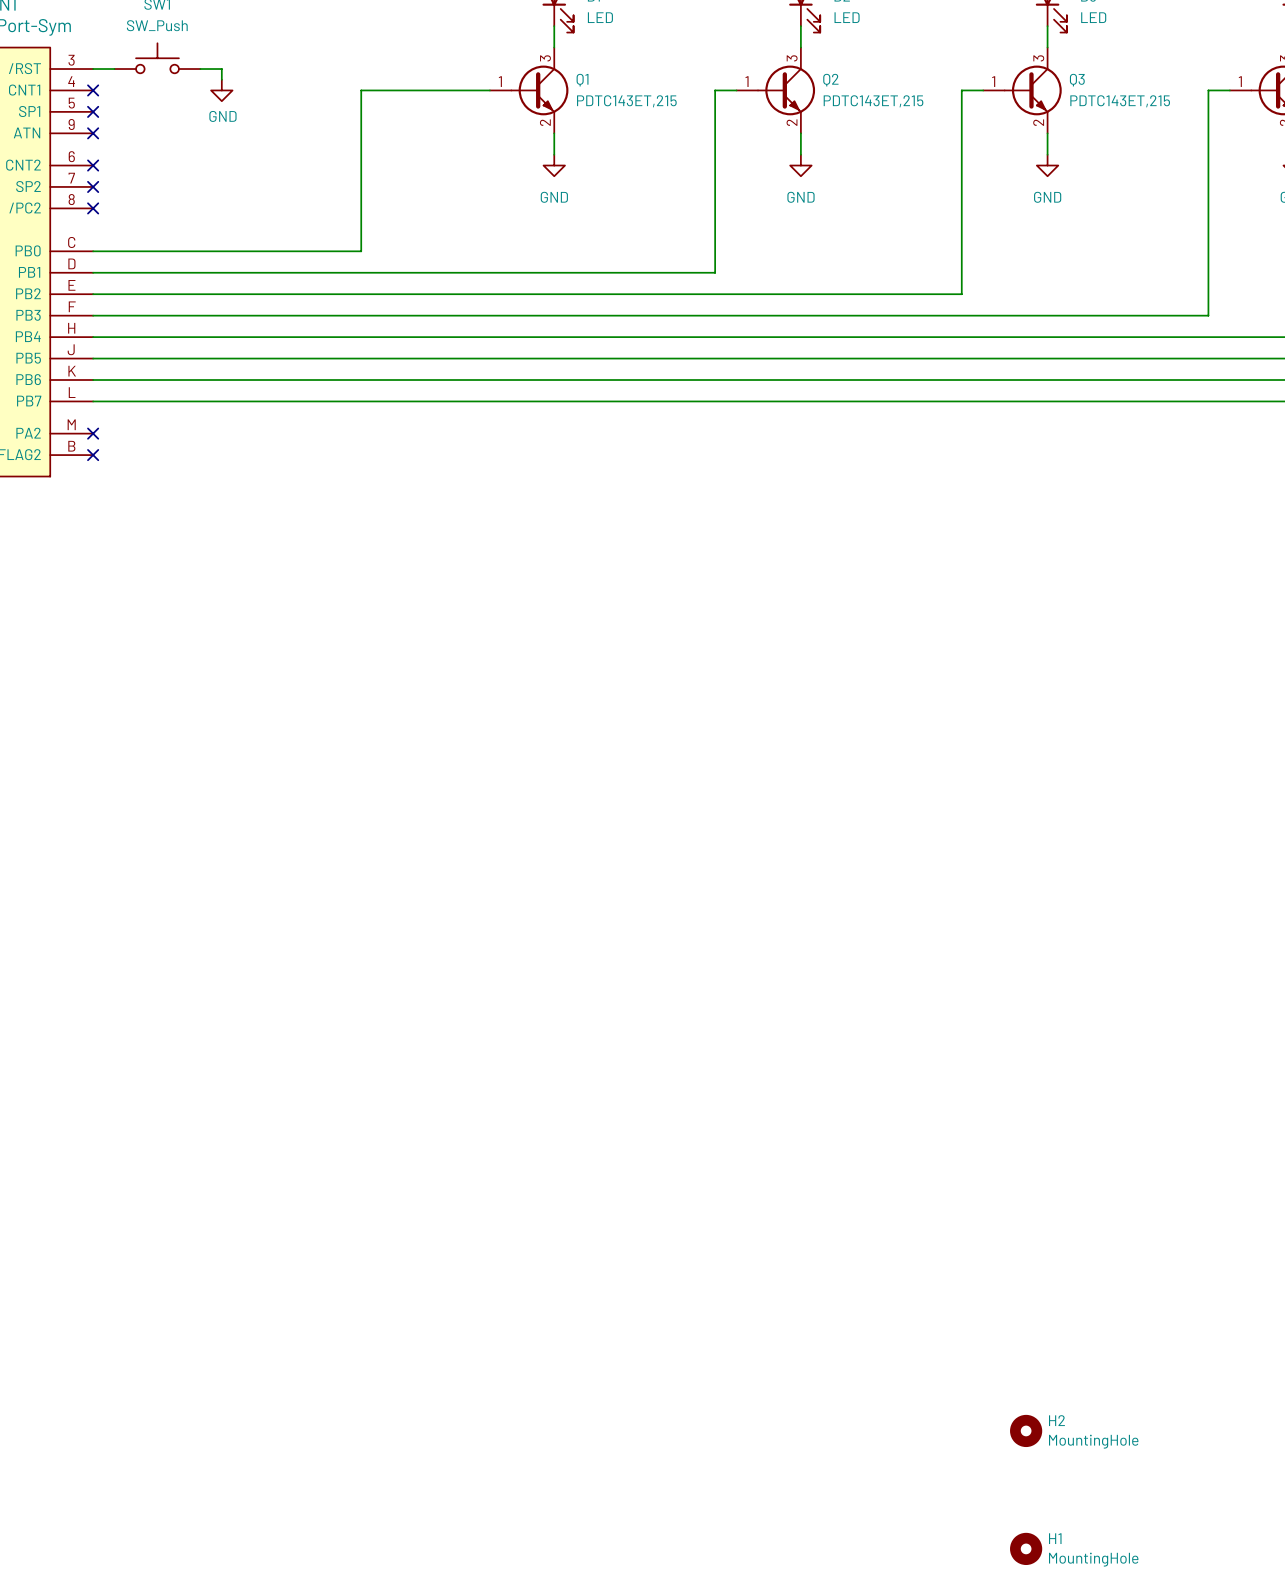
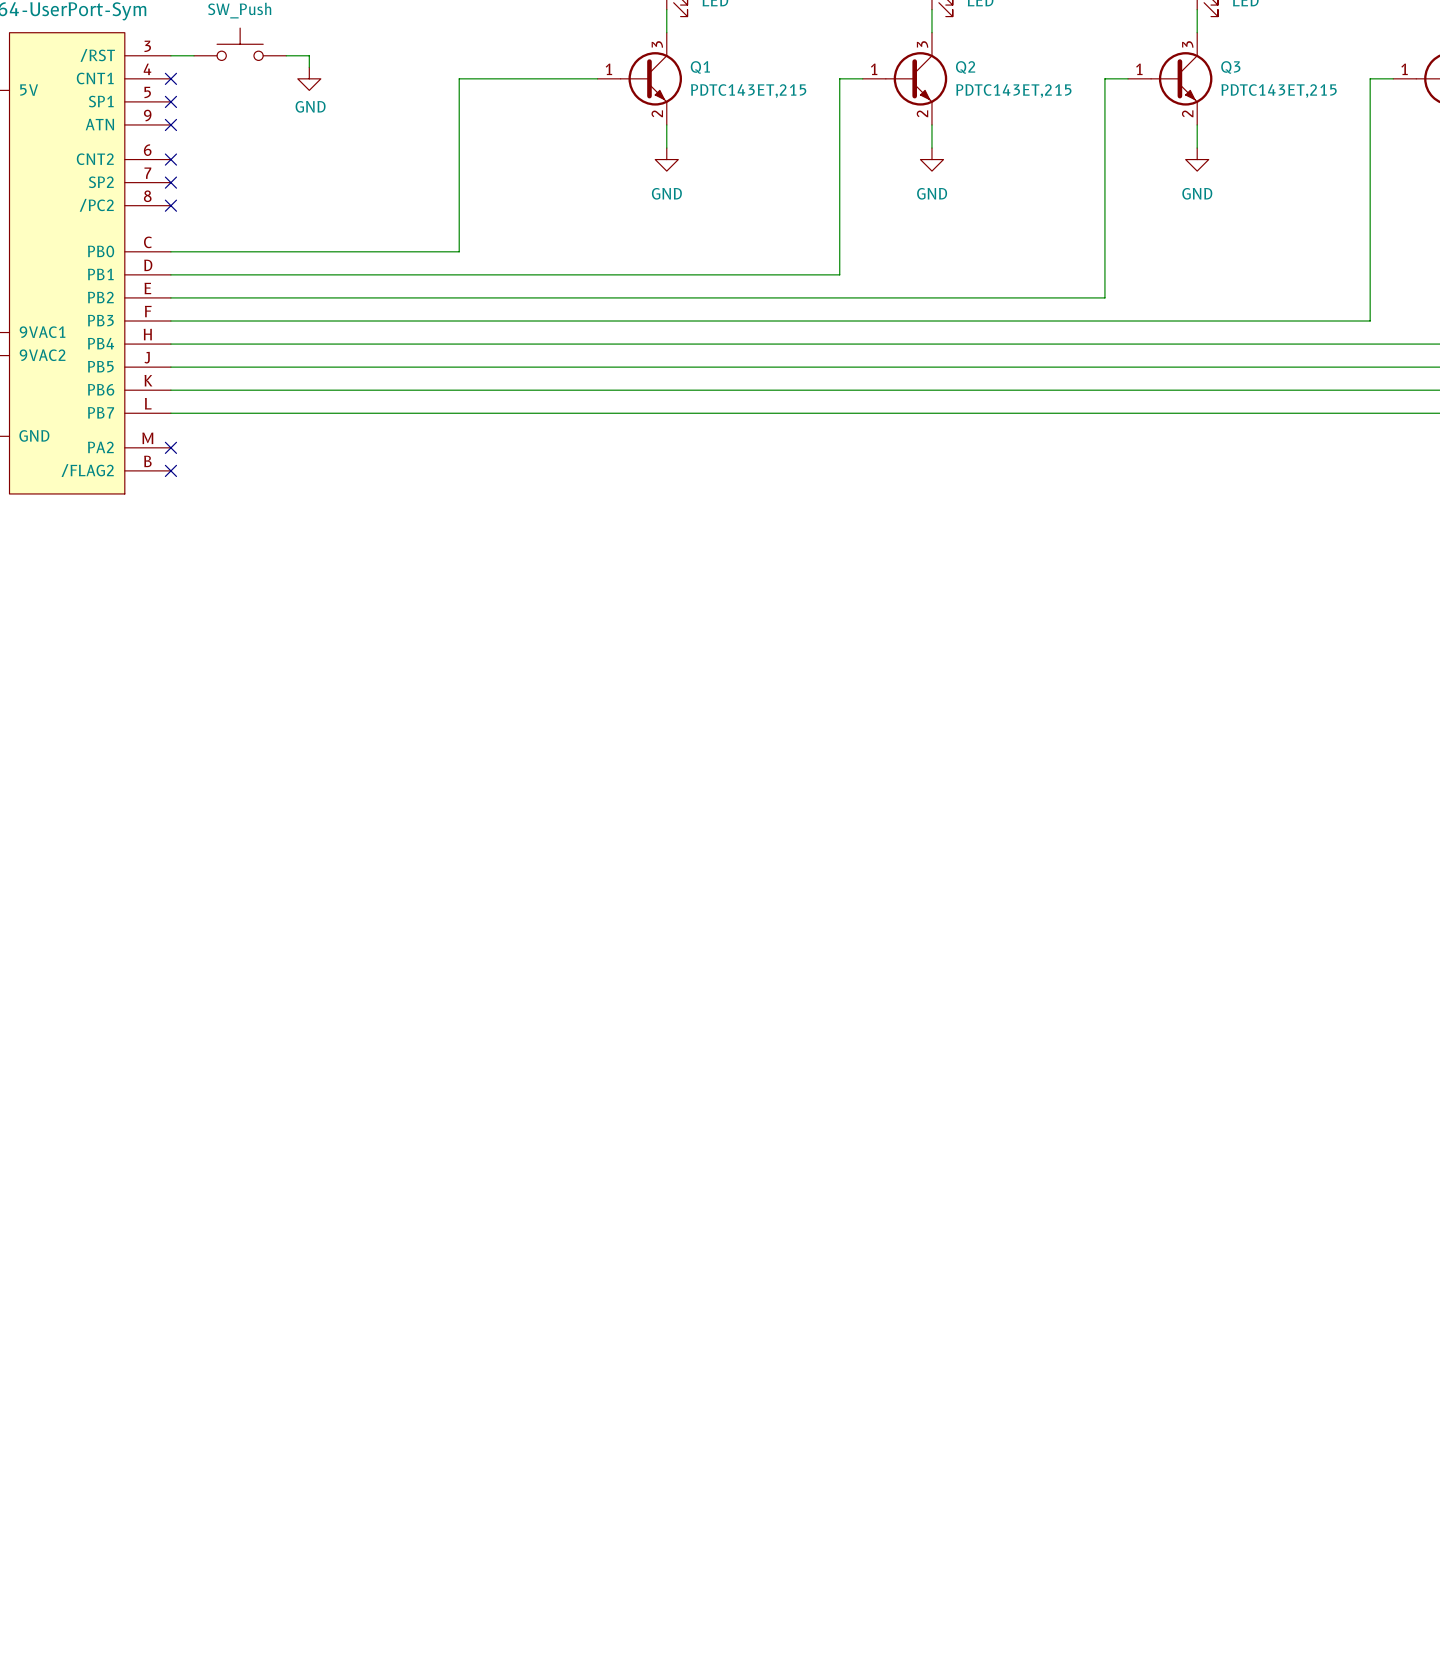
H2: MountingHole (1026, 1430) -> none
H1: MountingHole (1026, 1548) -> none

